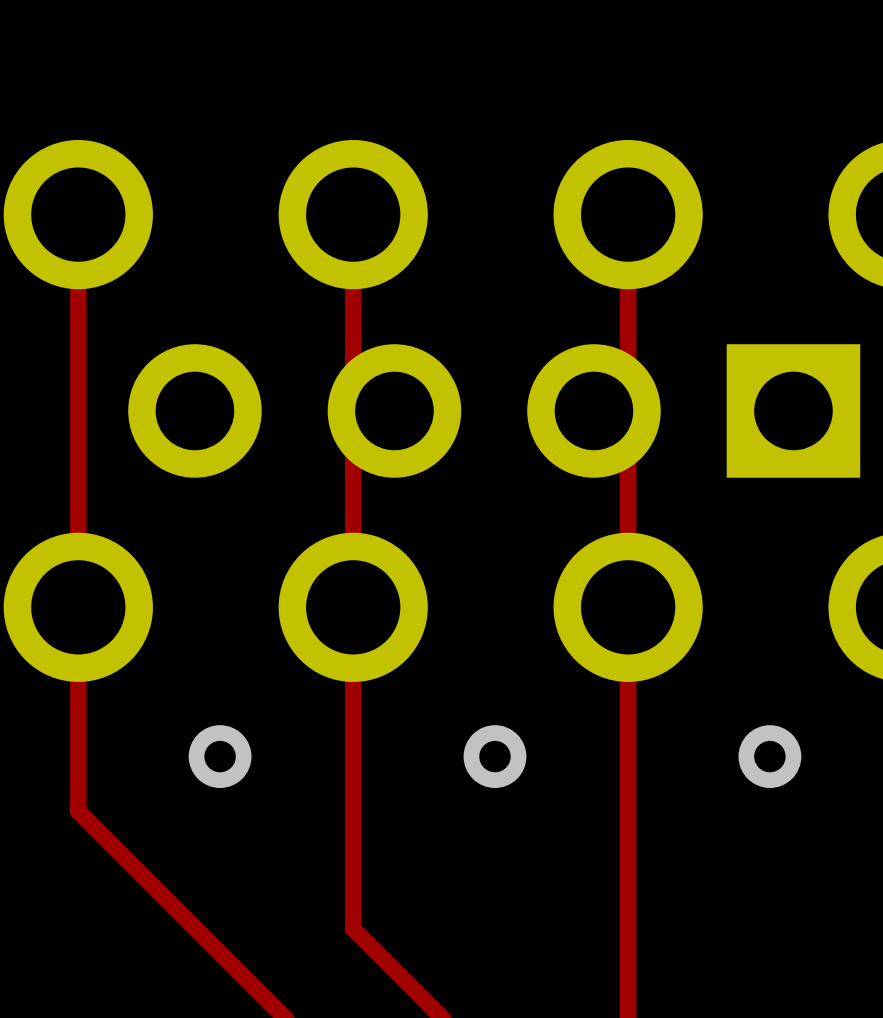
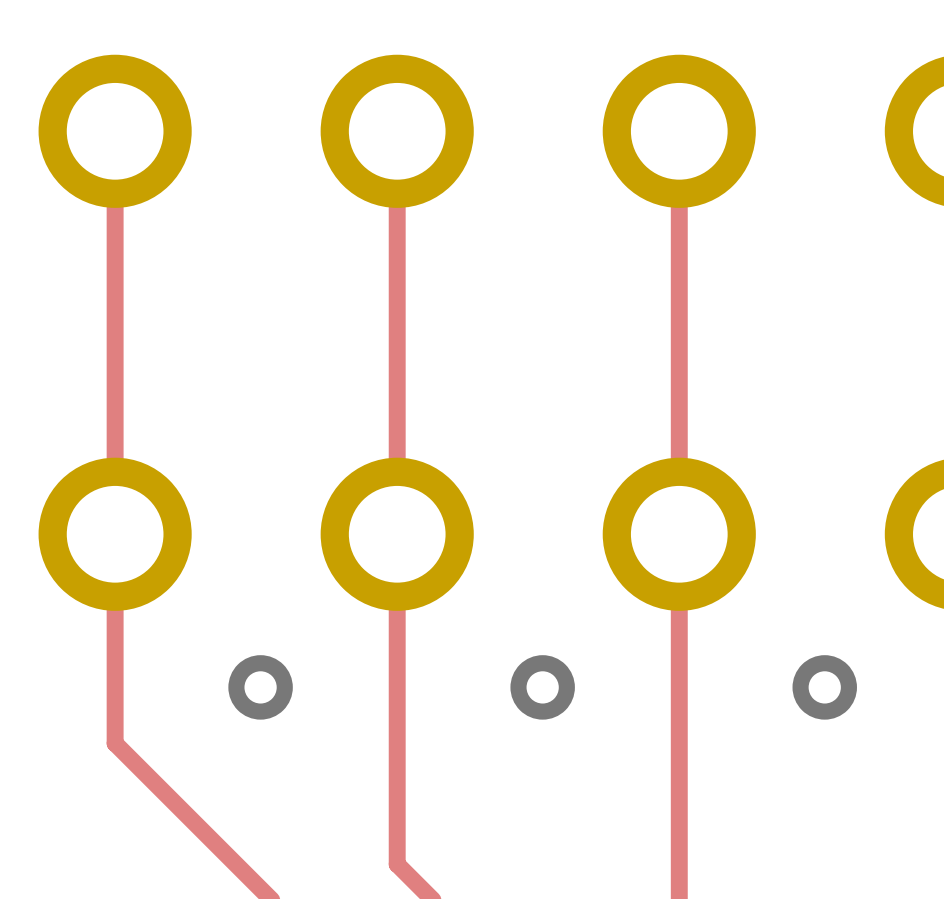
part: (494, 410) -> none

